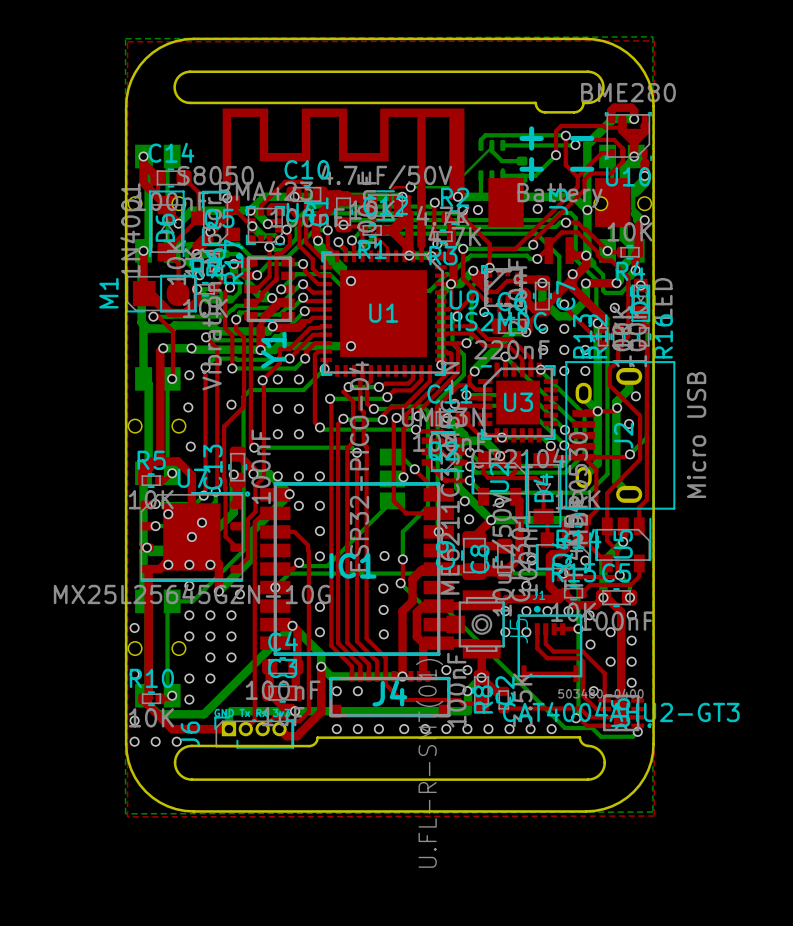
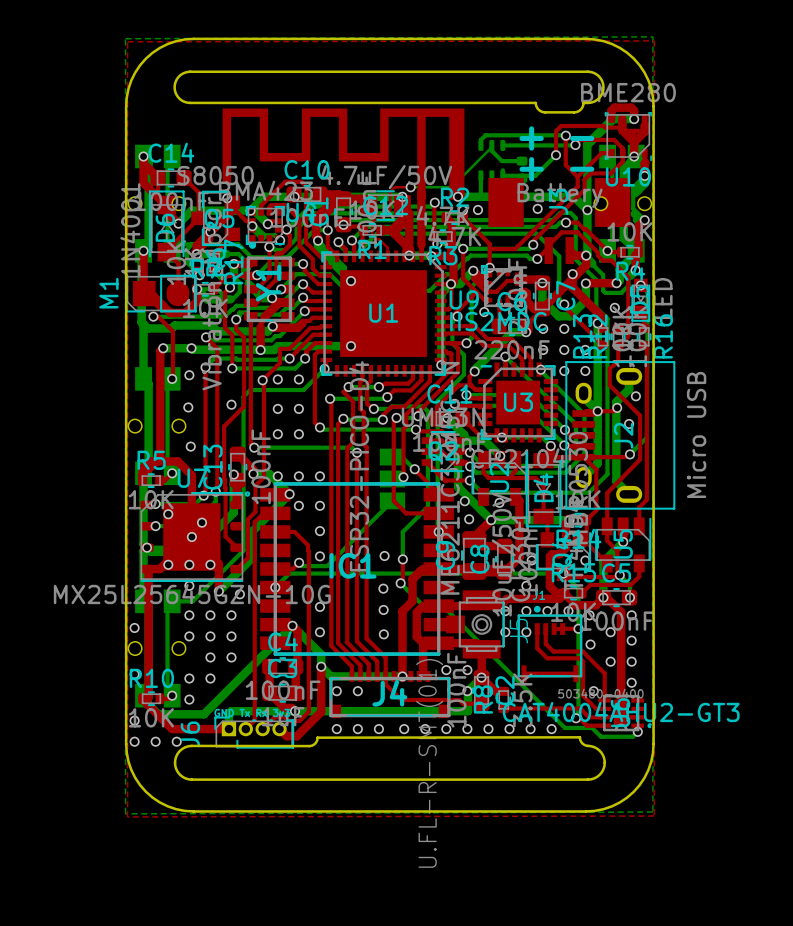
Y1 footprint: [236, 252, 295, 323] -> [244, 242, 295, 323]
Y1 name position: Y1 (273, 350) -> Y1 (268, 283)

